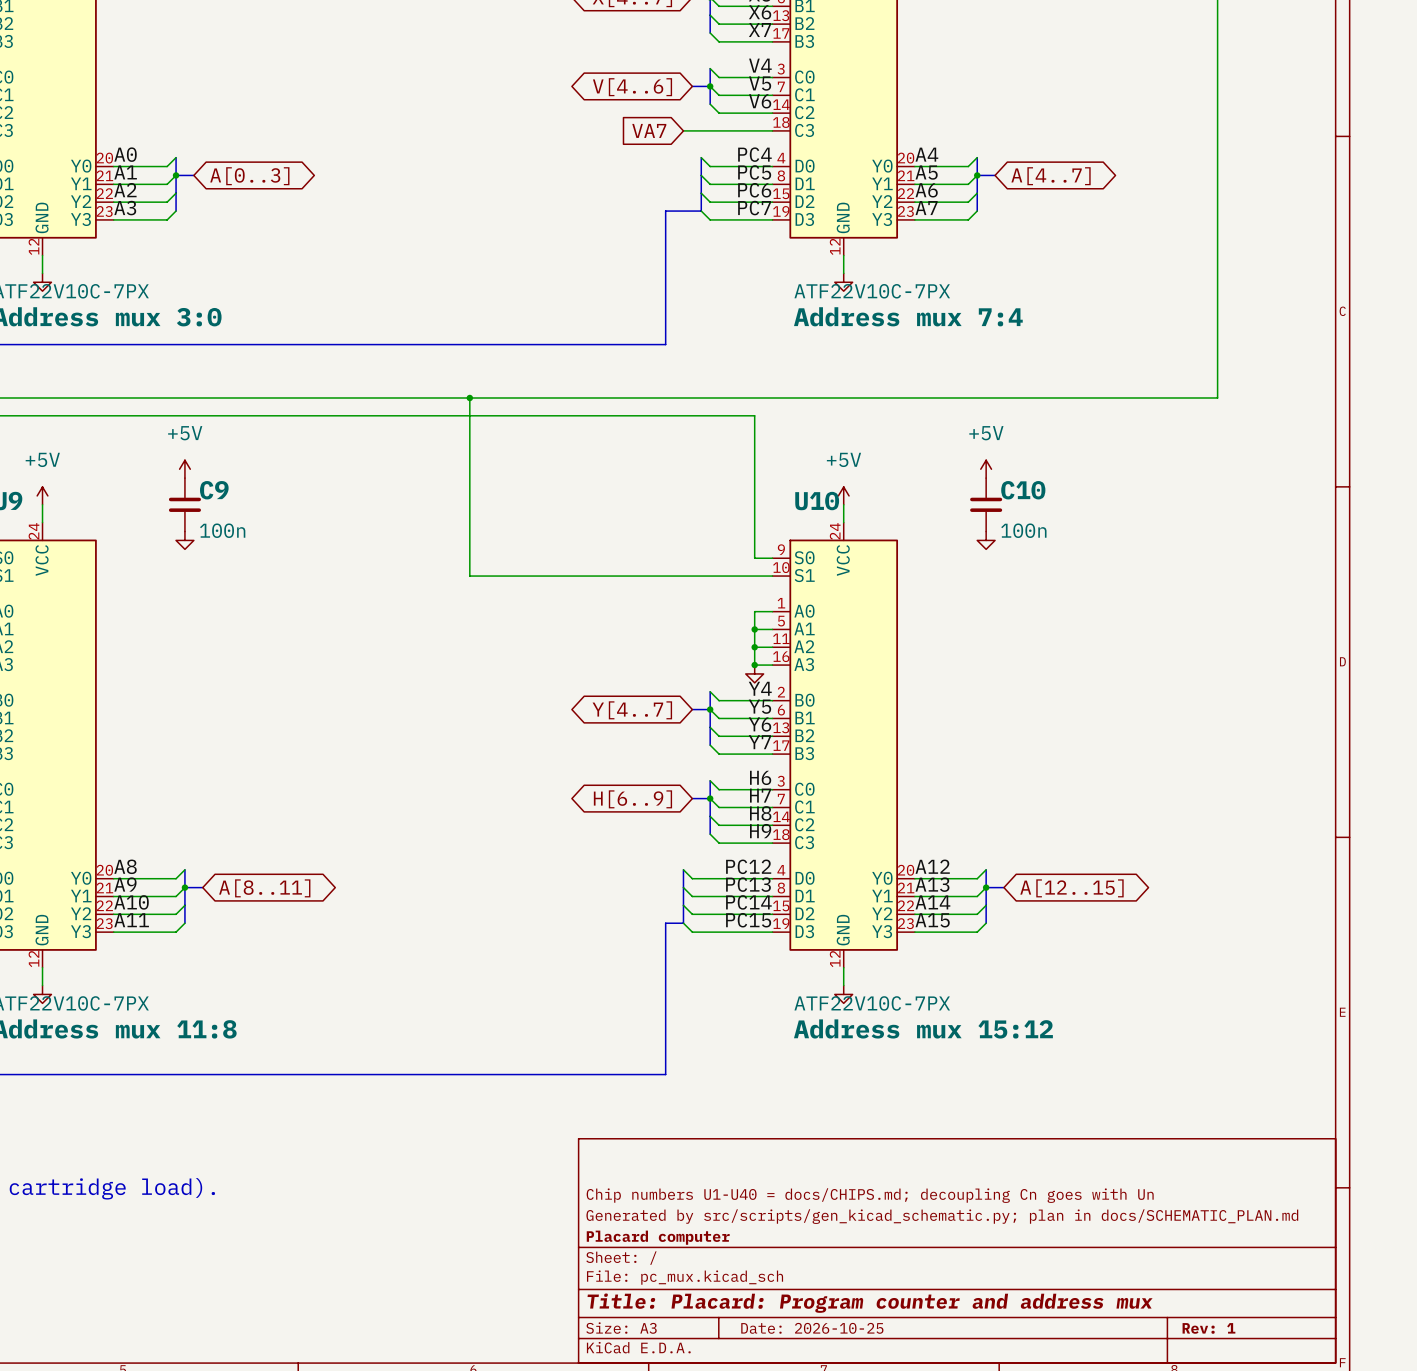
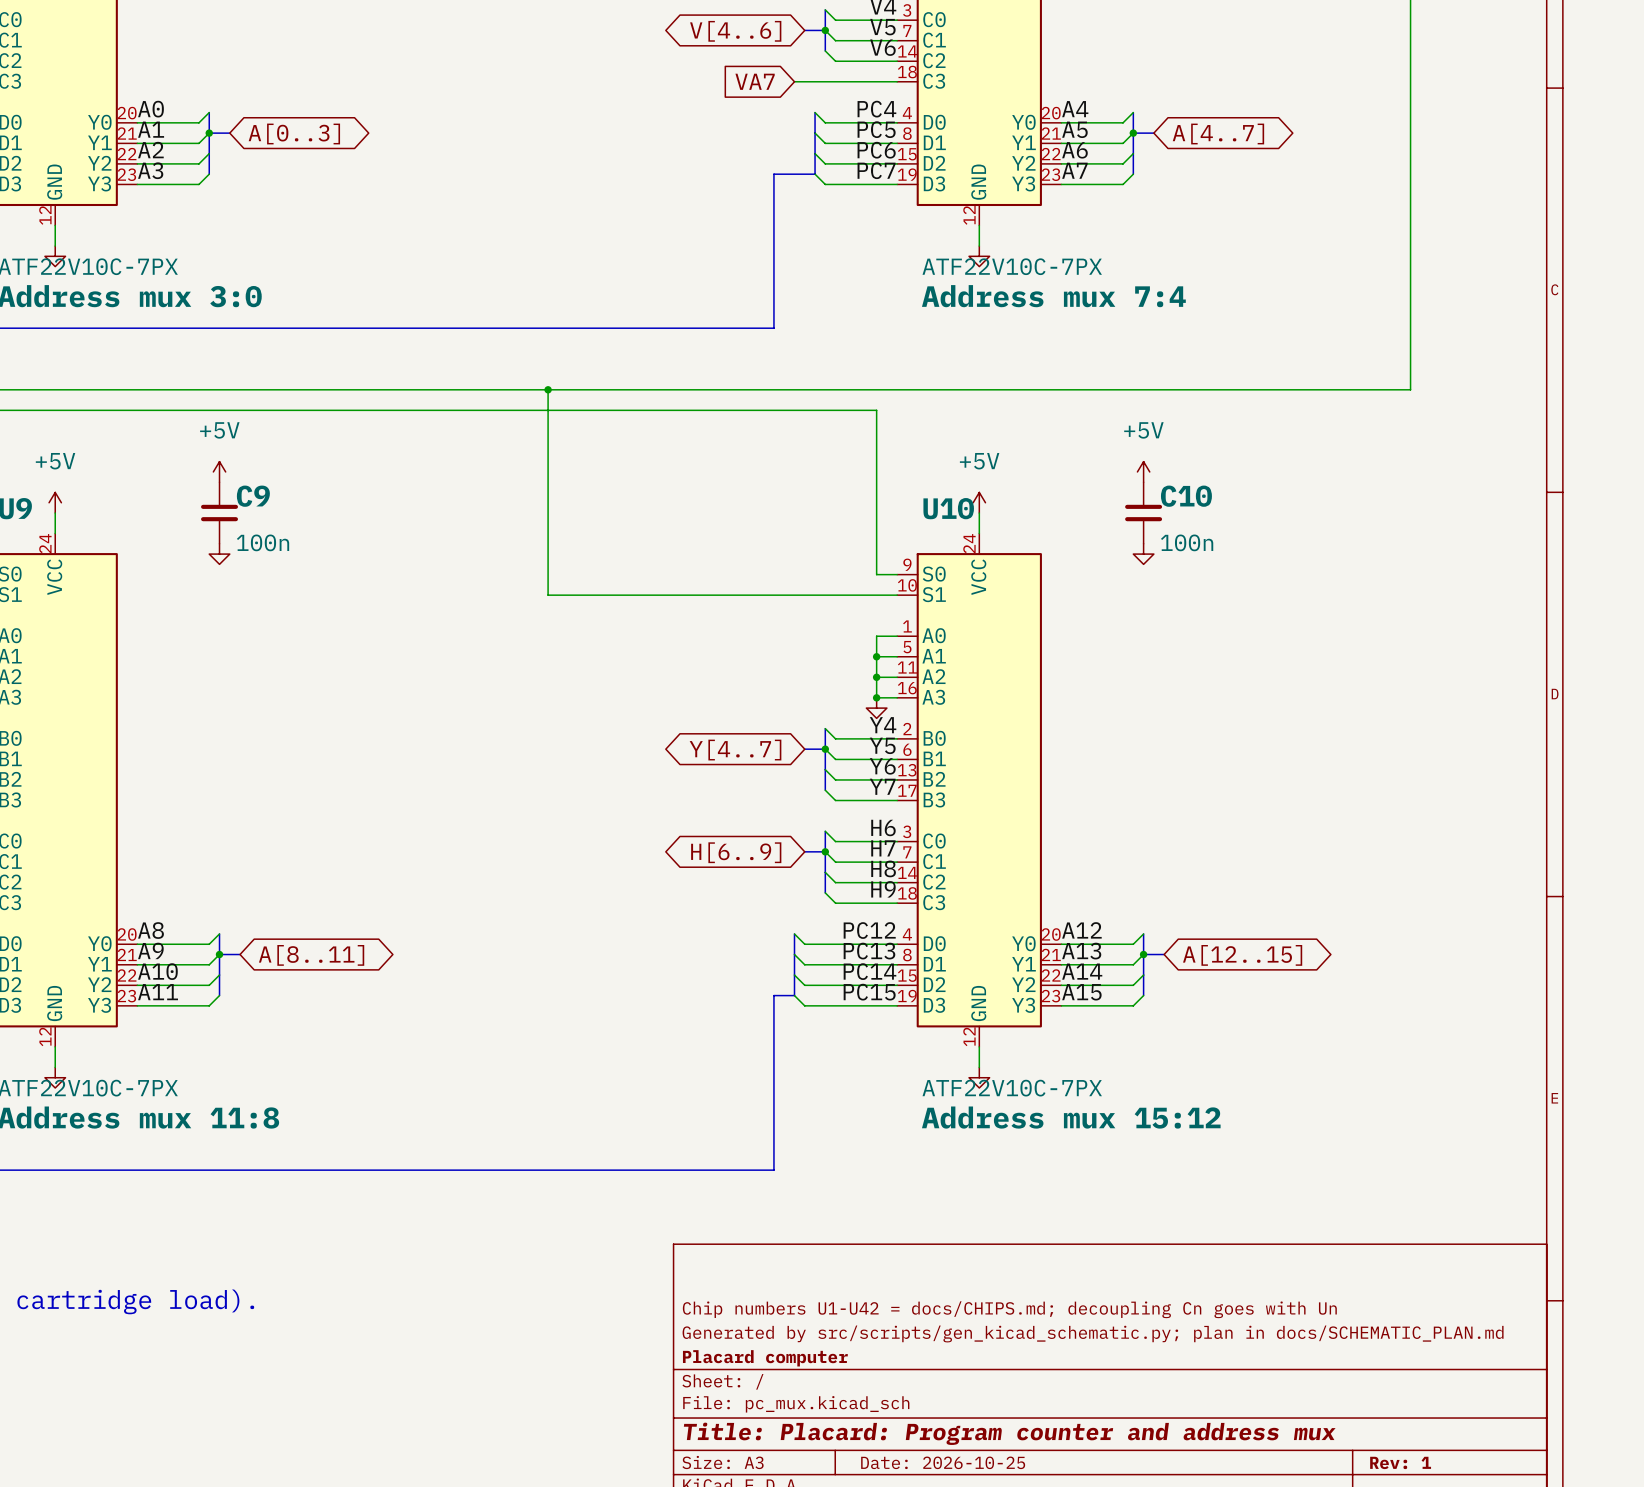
title block: Chip numbers U1-U40 = docs/CHIPS.md; decoupling Cn goes with Un (870, 1195) -> Chip numbers U1-U42 = docs/CHIPS.md; decoupling Cn goes with Un (1009, 1309)

